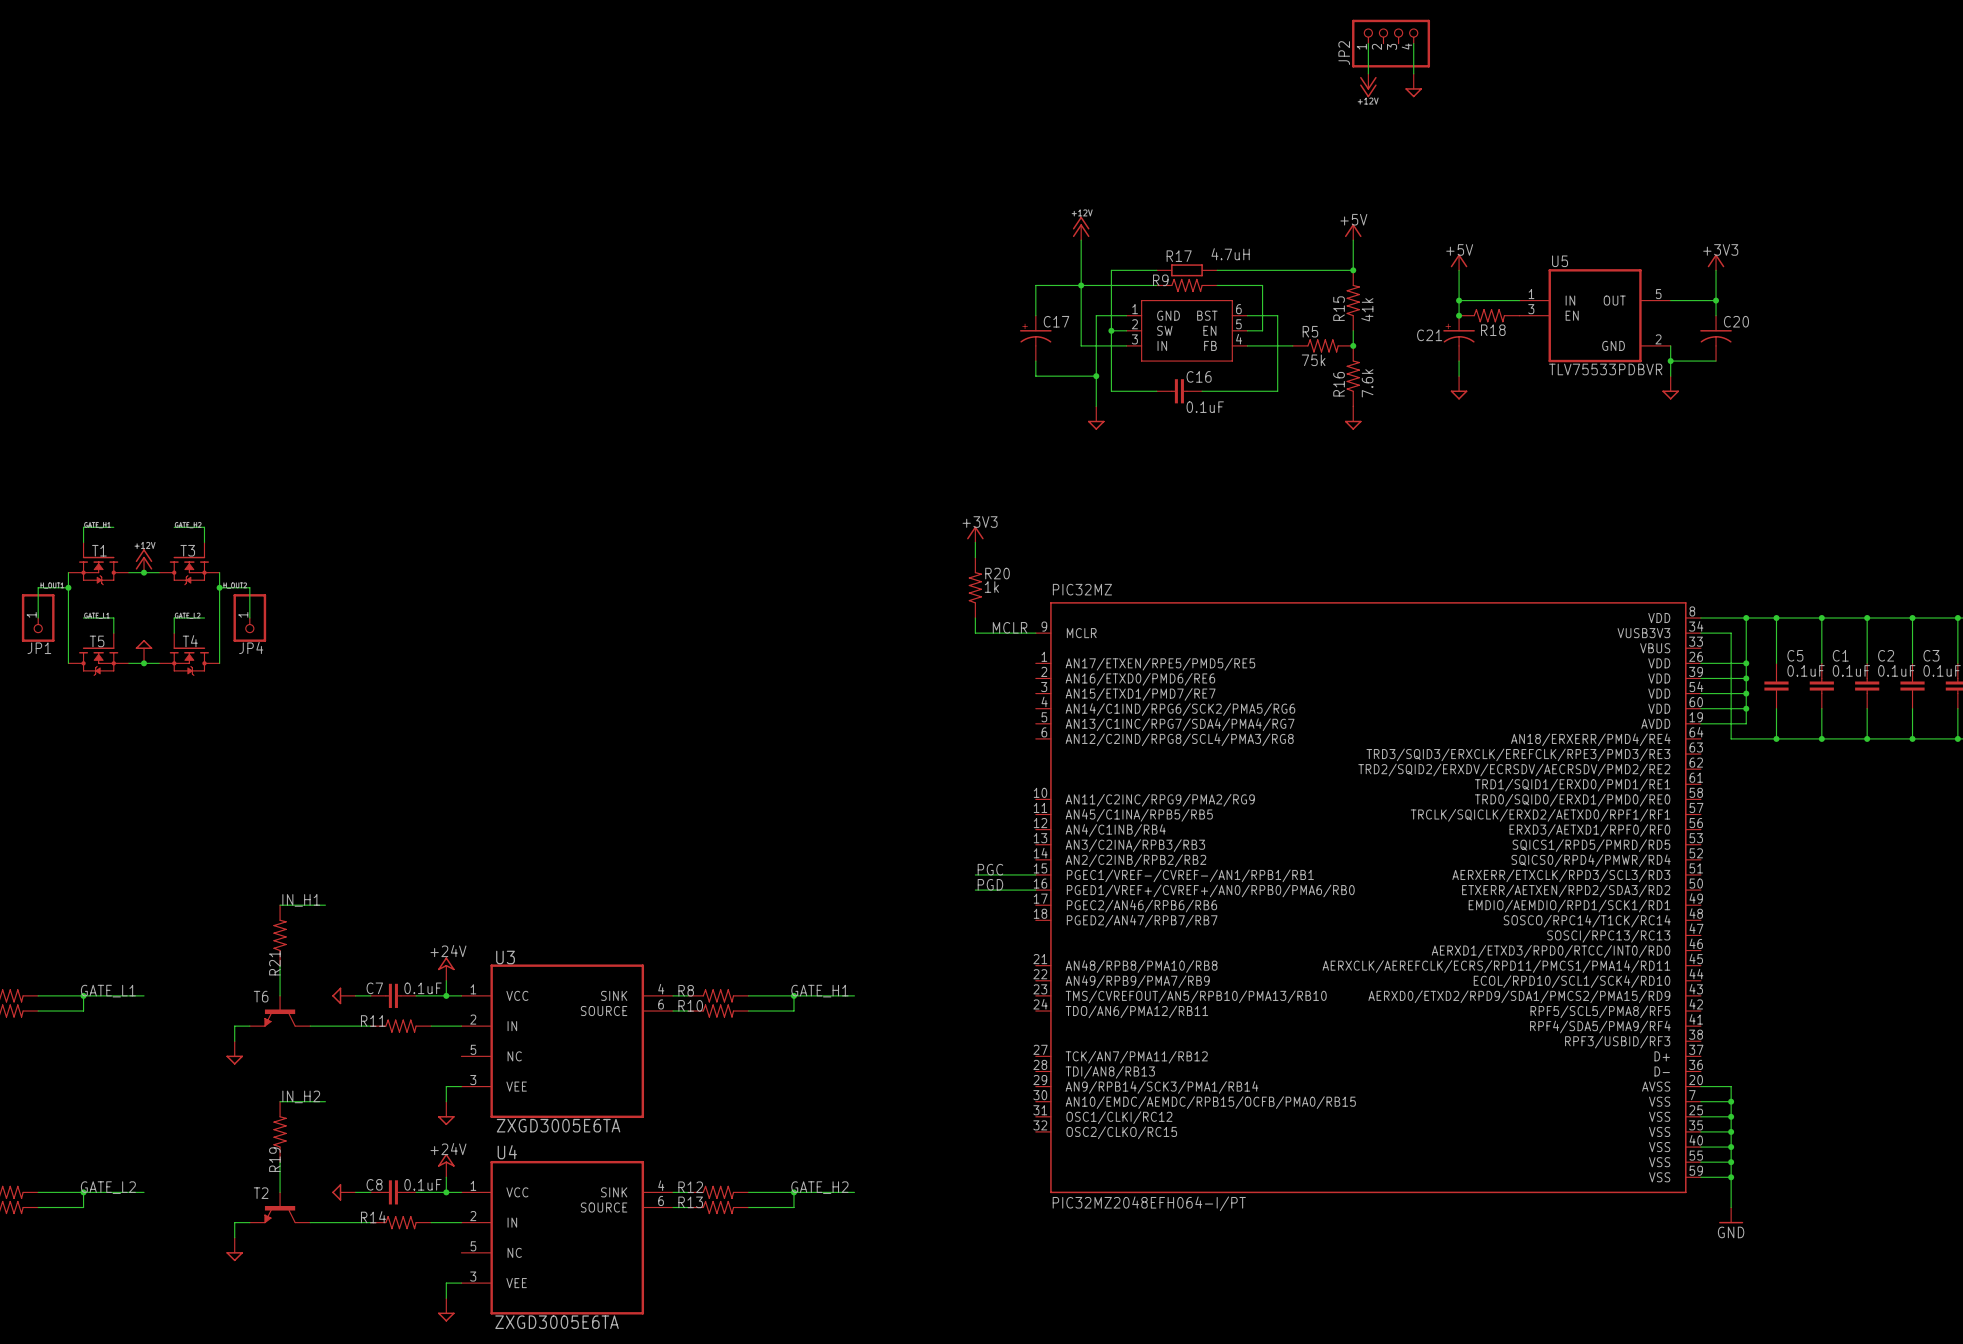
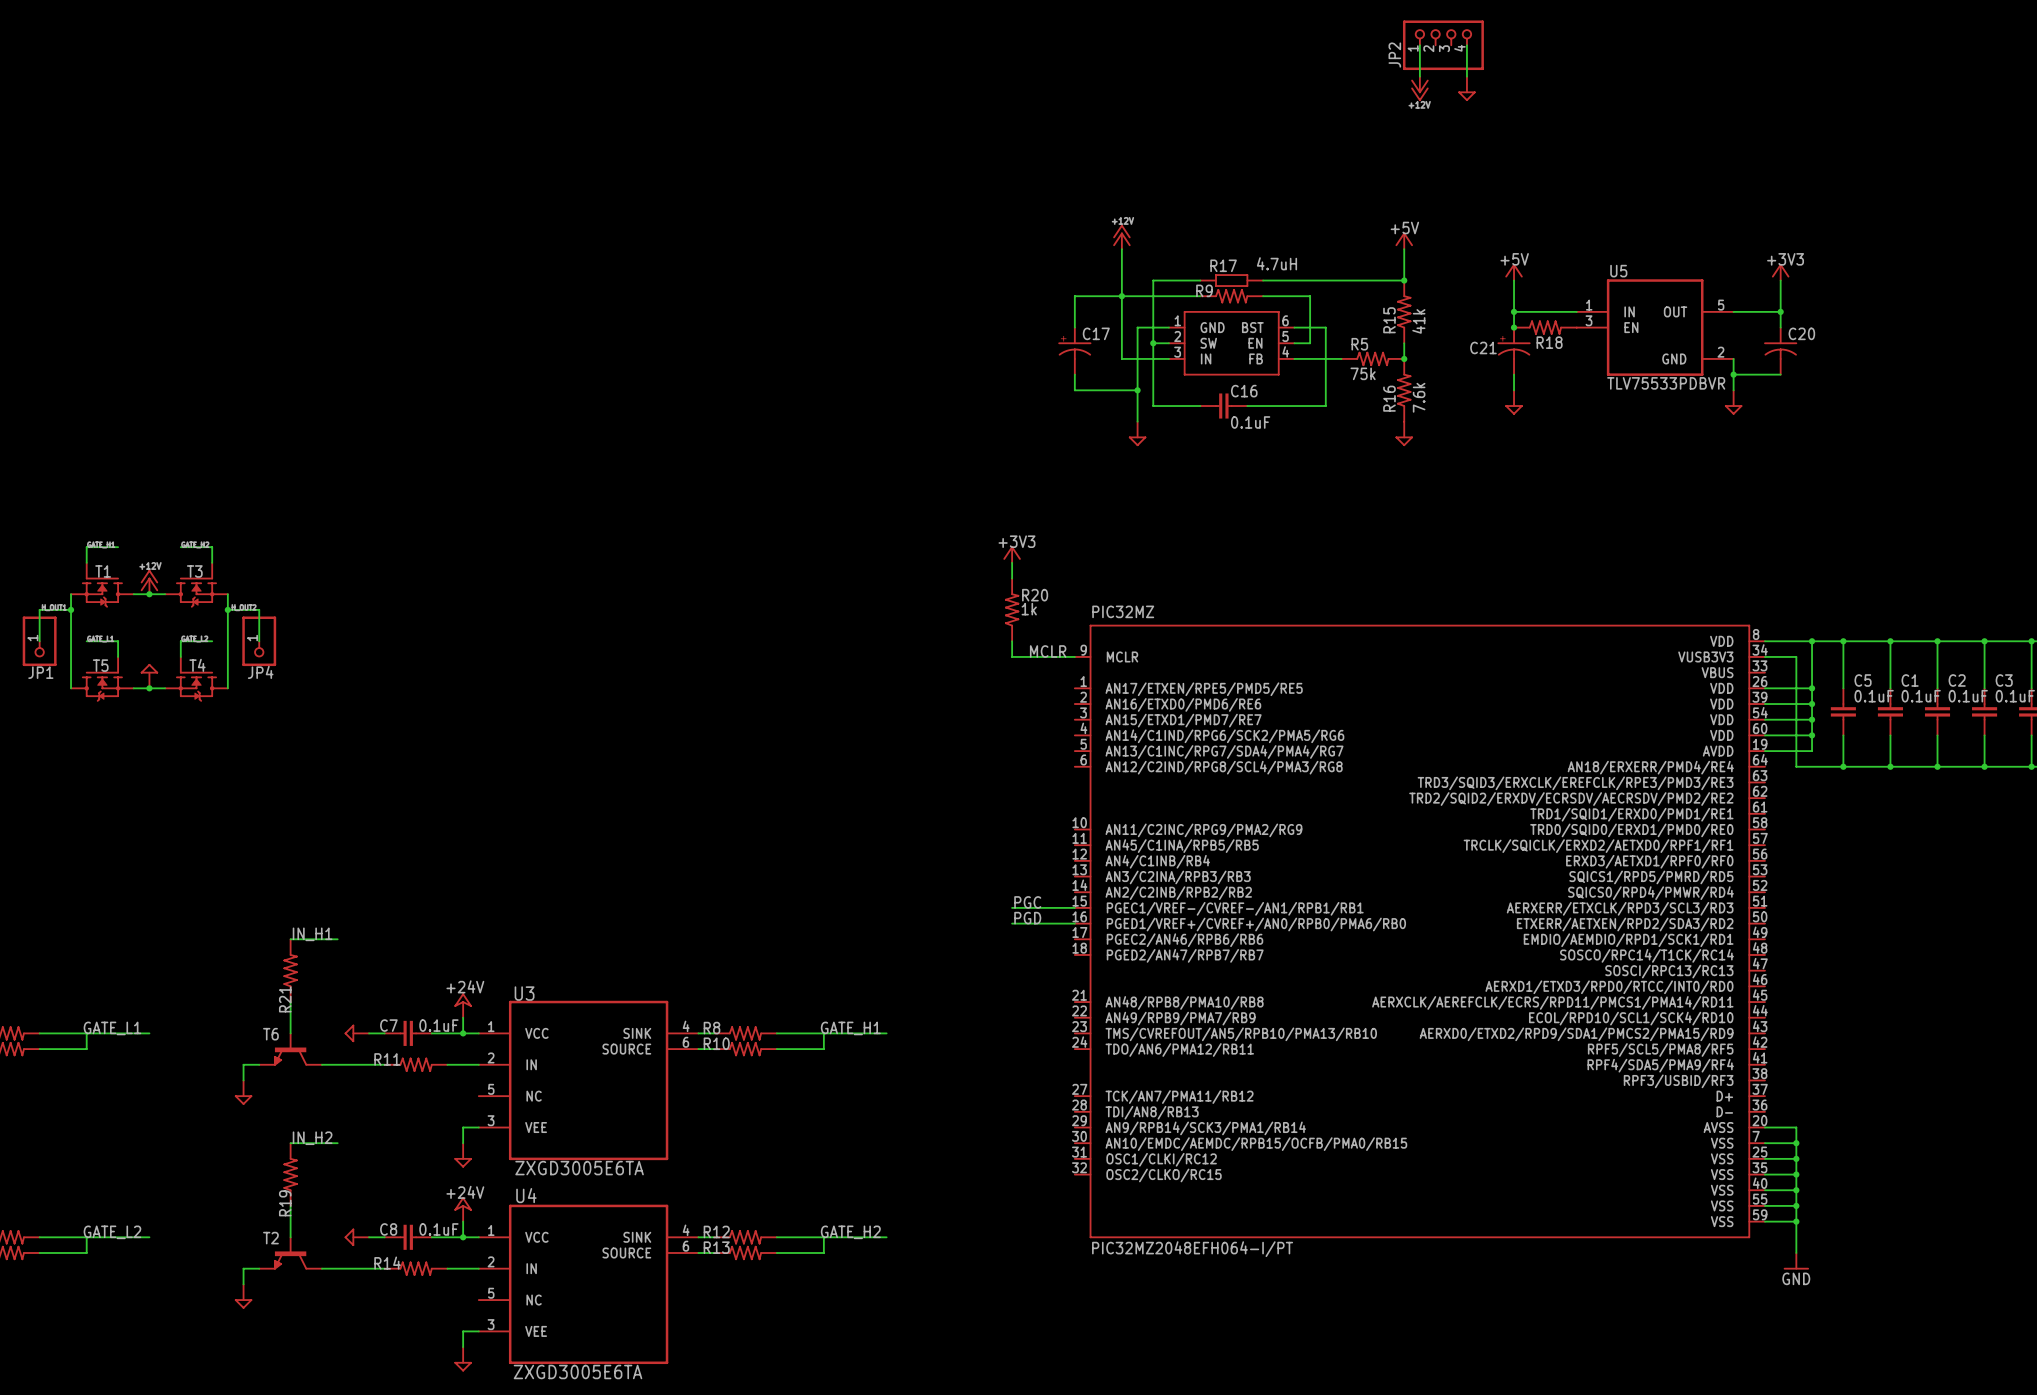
junction: (83, 995) -> none
junction: (793, 995) -> none
junction: (83, 1192) -> none
junction: (793, 1192) -> none

